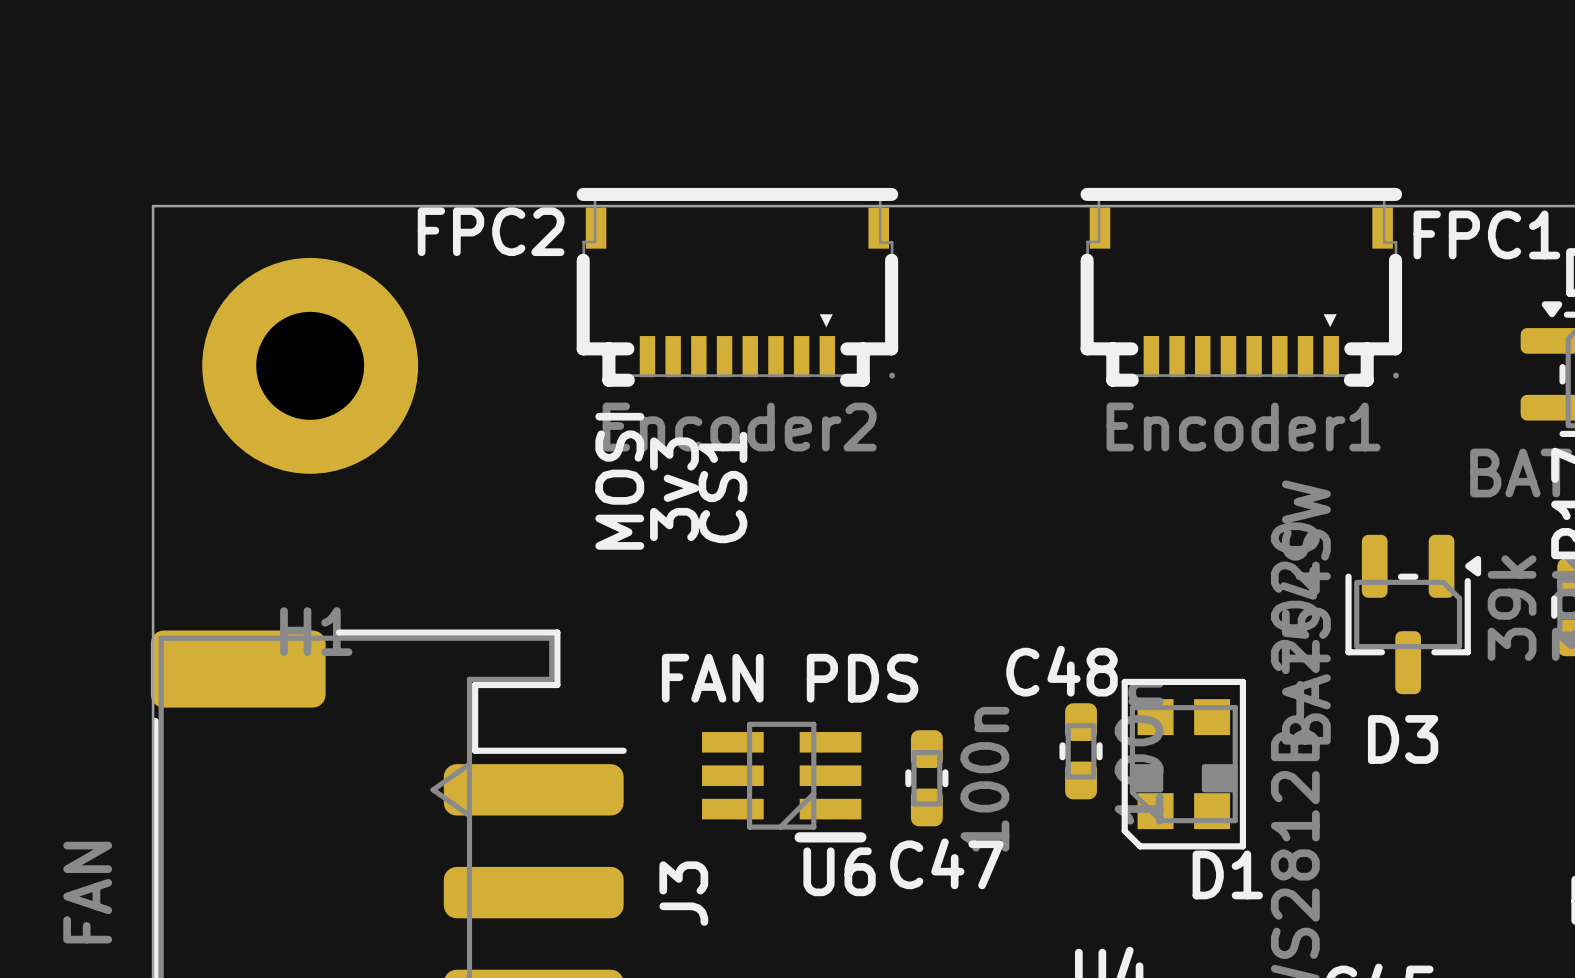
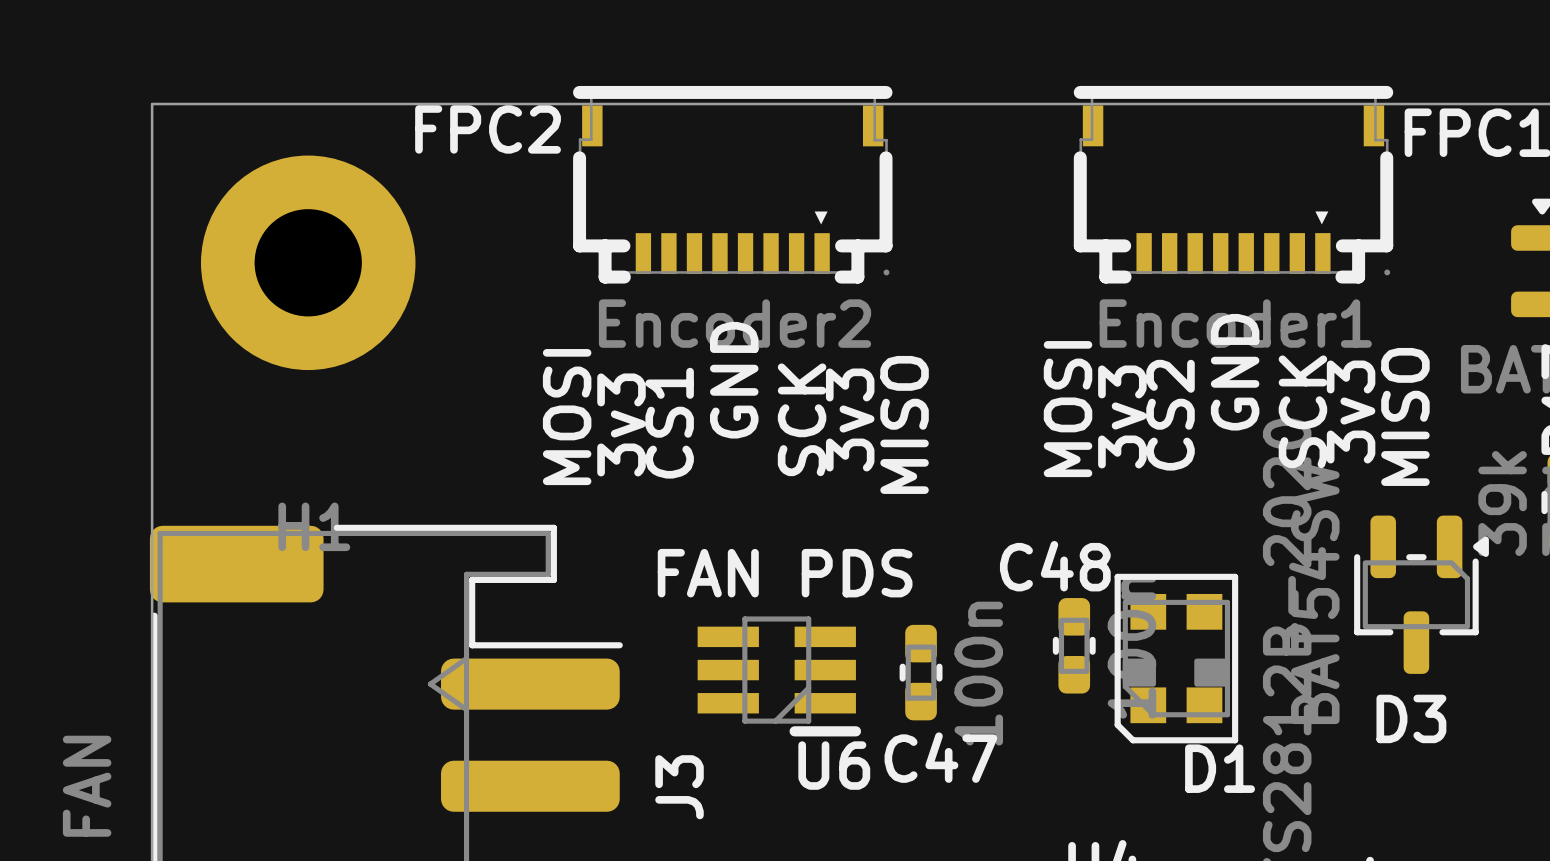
text: none -> GND (1235, 372)
text position: MOSI (619, 481) -> MOSI (567, 417)
text: none -> GND (734, 380)
text position: CS1 (722, 487) -> CS1 (669, 423)
text position: 3v3 (674, 489) -> 3v3 (621, 424)
text: none -> MOSI (1068, 409)
text: none -> SCK (1302, 411)
text: none -> 3v3 (1351, 411)
text: none -> CS2 (1170, 415)
text: none -> 3v3 (1122, 416)
text: none -> MISO (1405, 416)
text: none -> SCK (802, 419)
text: none -> 3v3 (850, 419)
text: none -> MISO (904, 424)
D3 position: (1413, 614) -> (1421, 594)

